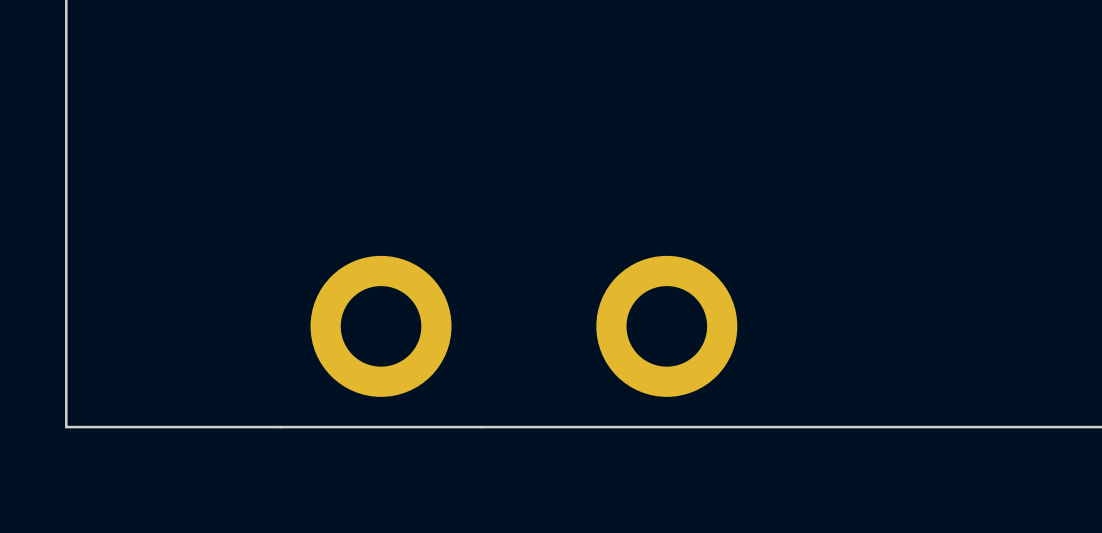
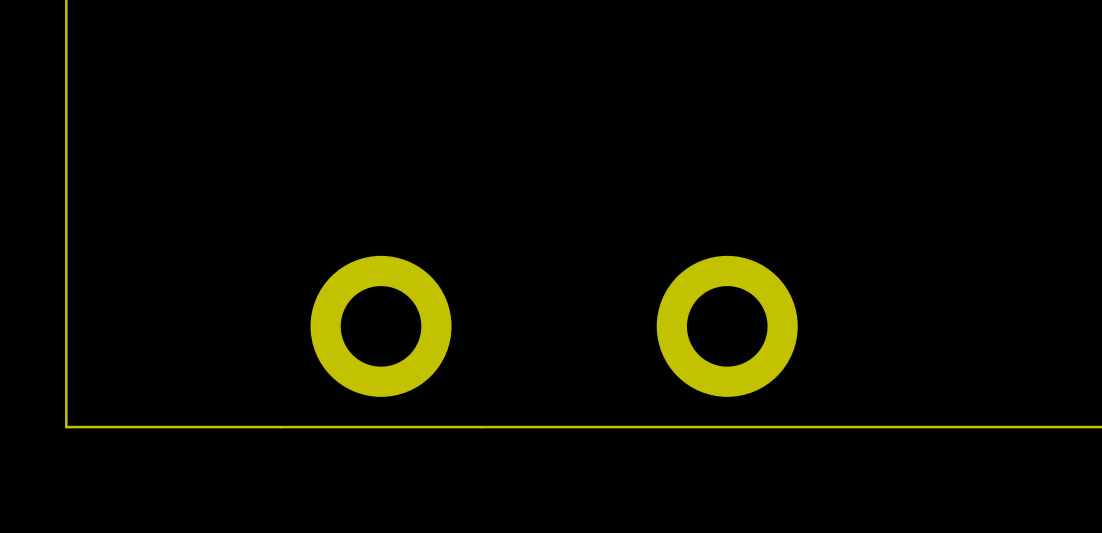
part position: (666, 326) -> (727, 326)

